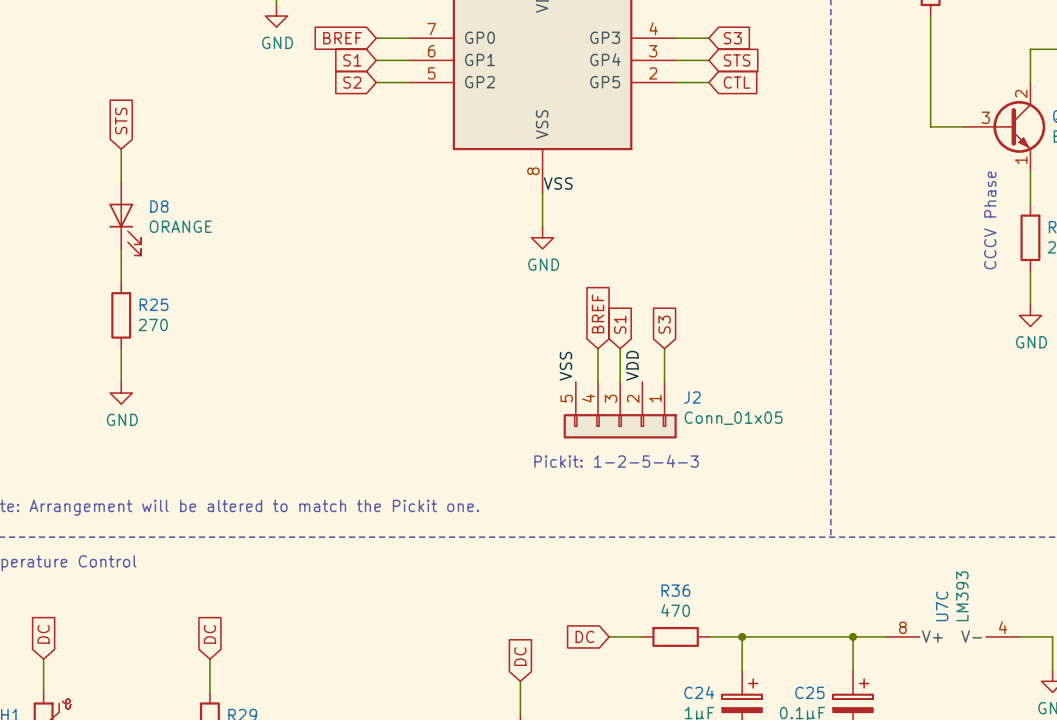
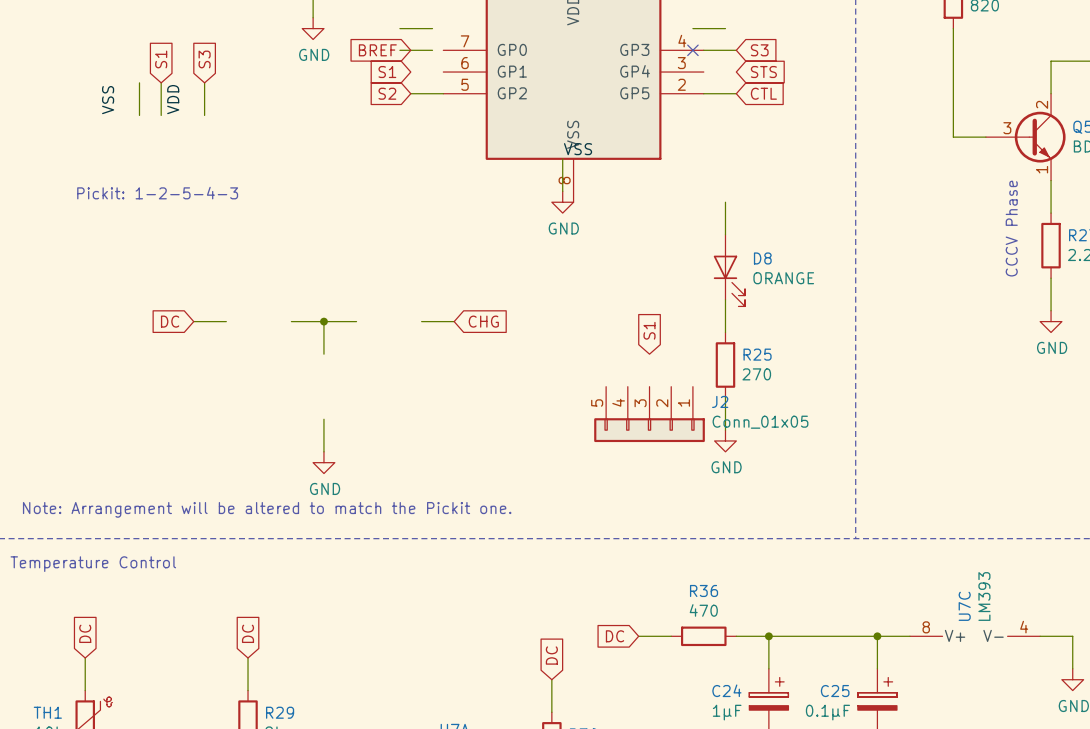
wire: (398, 38) (409, 38) -> (399, 50) (410, 50)
no-connect mark: none -> (692, 50)
global label: none -> S1 (161, 59)
global label: none -> S3 (204, 59)
wire: (376, 60) (409, 60) -> (399, 28) (432, 28)
wire: (675, 60) (708, 60) -> (692, 28) (725, 28)
wire: none -> (139, 82) (139, 115)
wire: none -> (204, 82) (204, 115)
label: none -> VDD (173, 99)
label: none -> VSS (108, 100)
global label: STS (121, 120) -> none
wire: (121, 149) (121, 182) -> (161, 82) (161, 115)
label position: VSS (558, 183) -> VSS (578, 149)
text: none -> Pickit: 1-2-5-4-3 (157, 193)
wire: (542, 193) (542, 226) -> (562, 158) (562, 191)
D8 position: (125, 218) -> (729, 270)
power symbol position: GND (542, 237) -> GND (562, 202)
wire: (121, 248) (121, 282) -> (323, 321) (323, 354)
global label: BREF (598, 313) -> none
R25 position: (121, 315) -> (725, 365)
global label: none -> DC (170, 321)
wire: none -> (193, 321) (226, 321)
wire: none -> (291, 321) (356, 321)
junction: none -> (323, 321)
wire: none -> (421, 321) (454, 321)
global label: none -> CHG (483, 321)
global label: S3 (664, 324) -> none
wire: (121, 348) (121, 381) -> (323, 419) (323, 451)
wire: (598, 348) (598, 381) -> (725, 202) (725, 234)
wire: (620, 348) (620, 381) -> (725, 299) (725, 332)
wire: (664, 348) (664, 381) -> (725, 397) (725, 430)
label: VDD (632, 365) -> none
label: VSS (565, 366) -> none
power symbol: GND (121, 393) -> none
power symbol: none -> GND (725, 440)
power symbol: none -> GND (323, 462)
text: Pickit: 1-2-5-4-3 (616, 461) -> none

